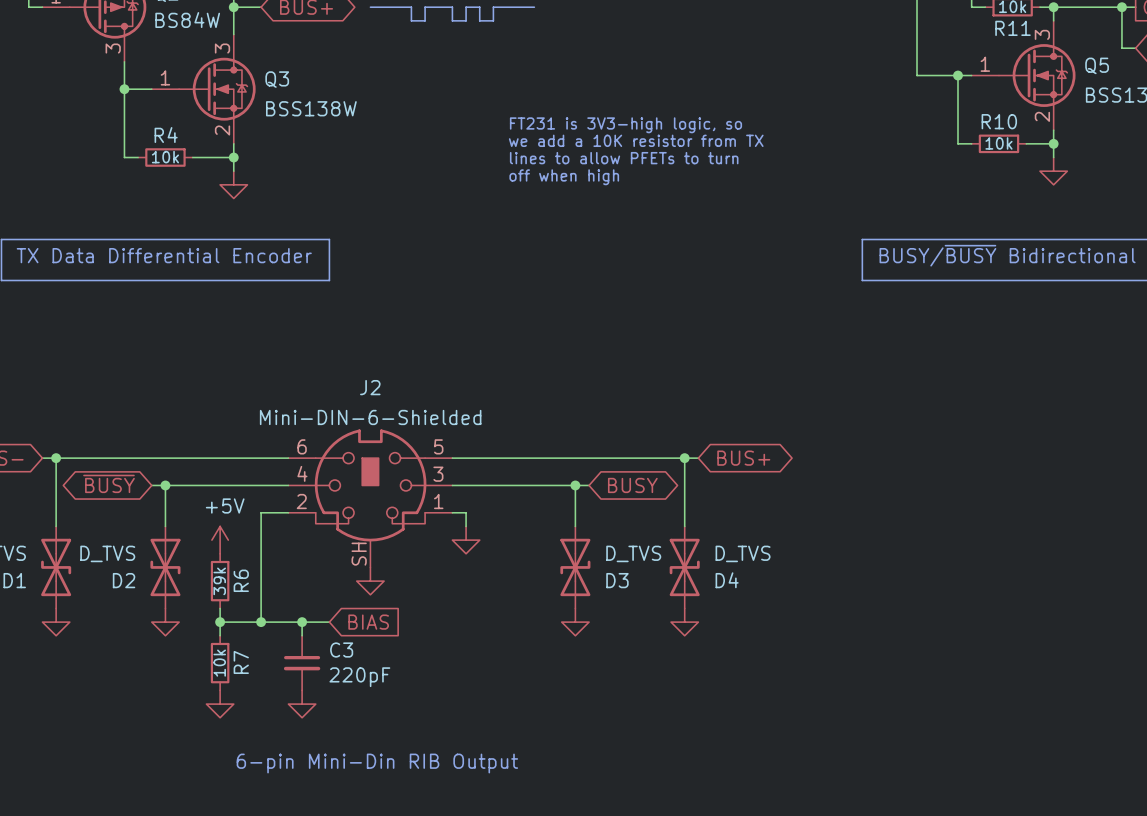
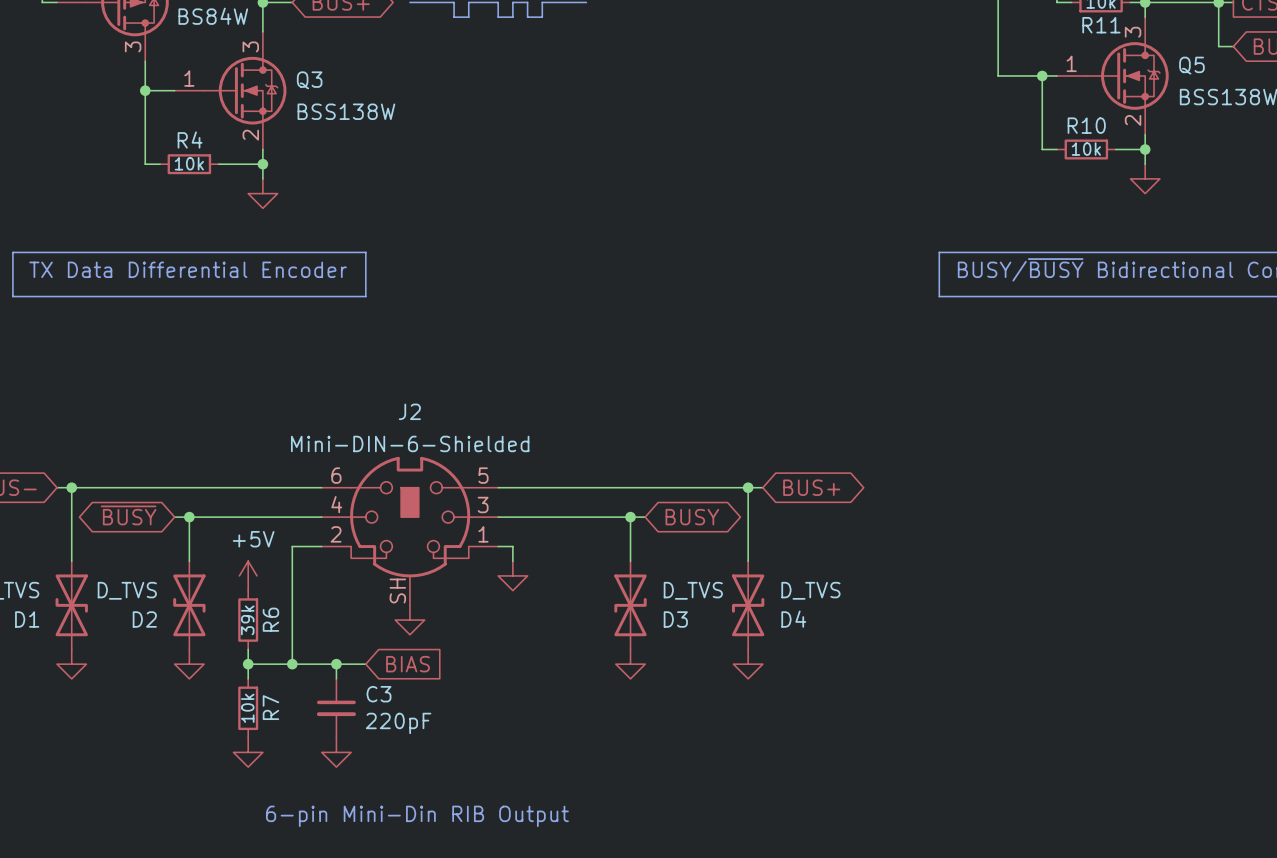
text: FT231 is 3V3-high logic, so (625, 125) -> none
text: we add a 10K resistor from TX (636, 140) -> none
text: lines to allow PFETs to turn (624, 158) -> none
text: off when high (564, 177) -> none

